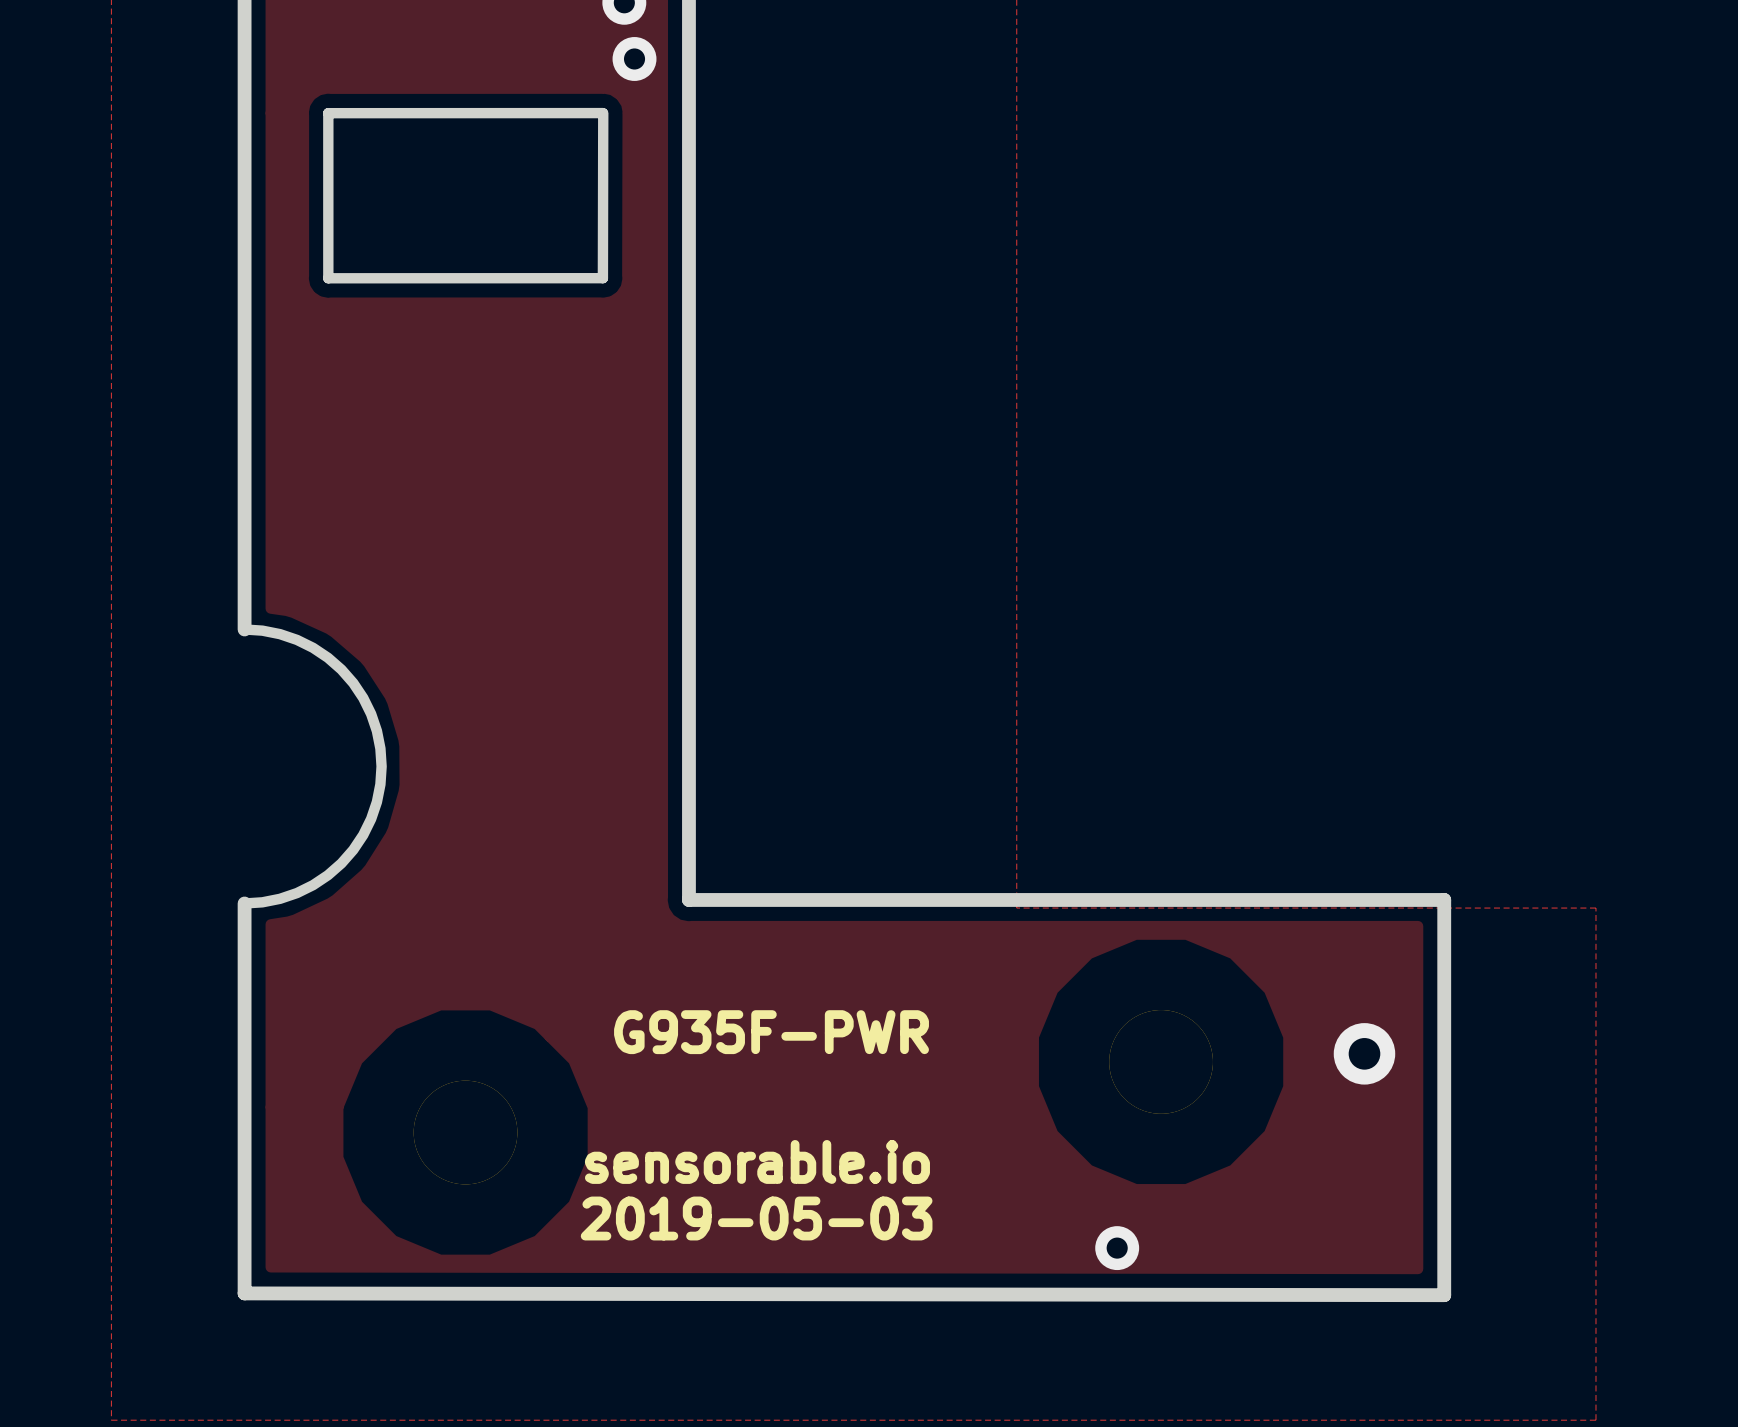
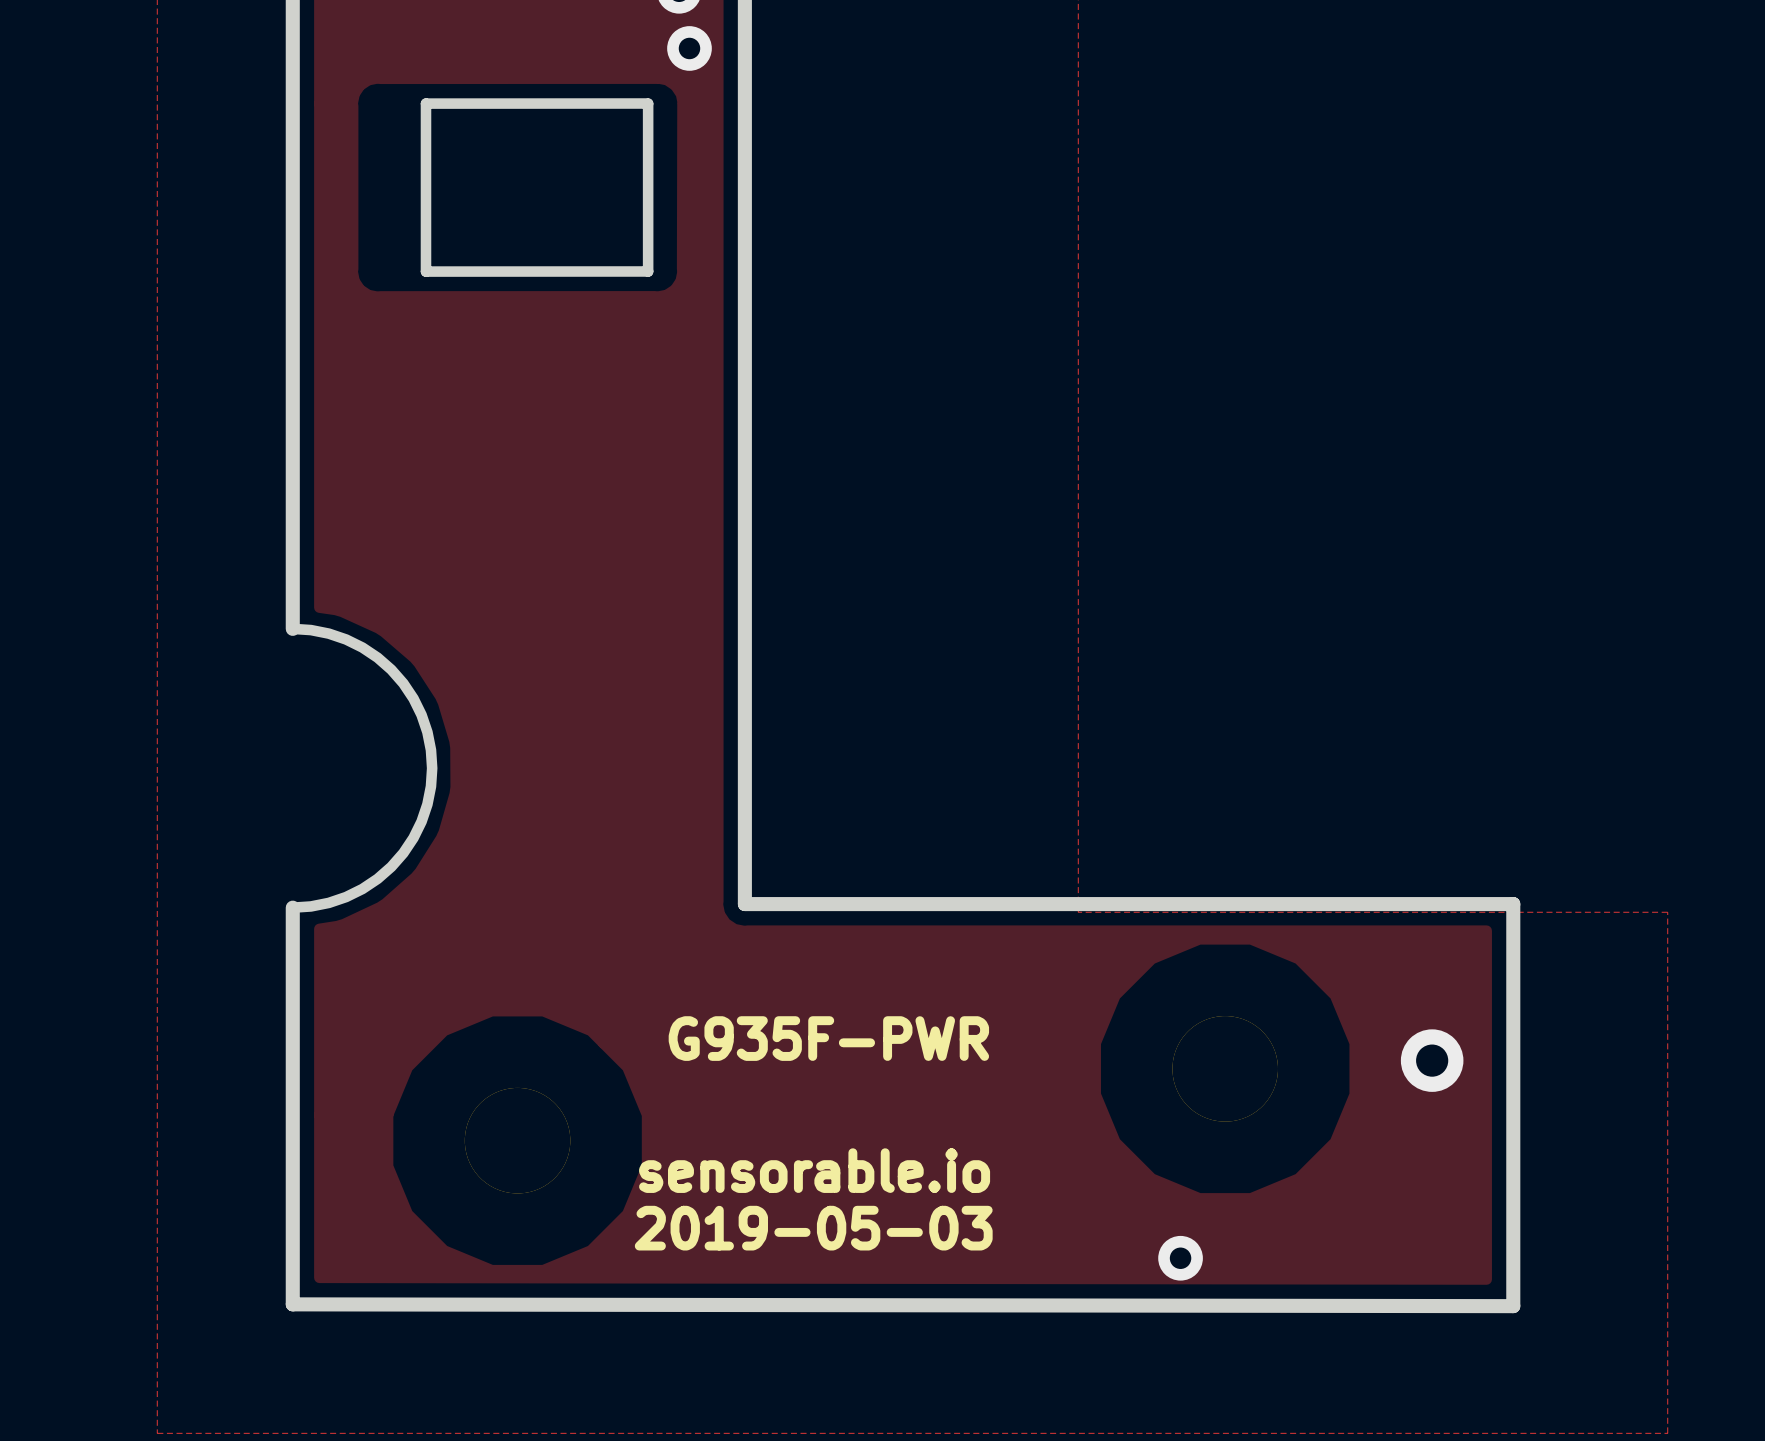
board edge: (375, 278) (328, 278) (328, 113) (602, 113) (602, 278) (593, 278) -> (425, 271) (425, 103) (648, 103) (648, 271)

